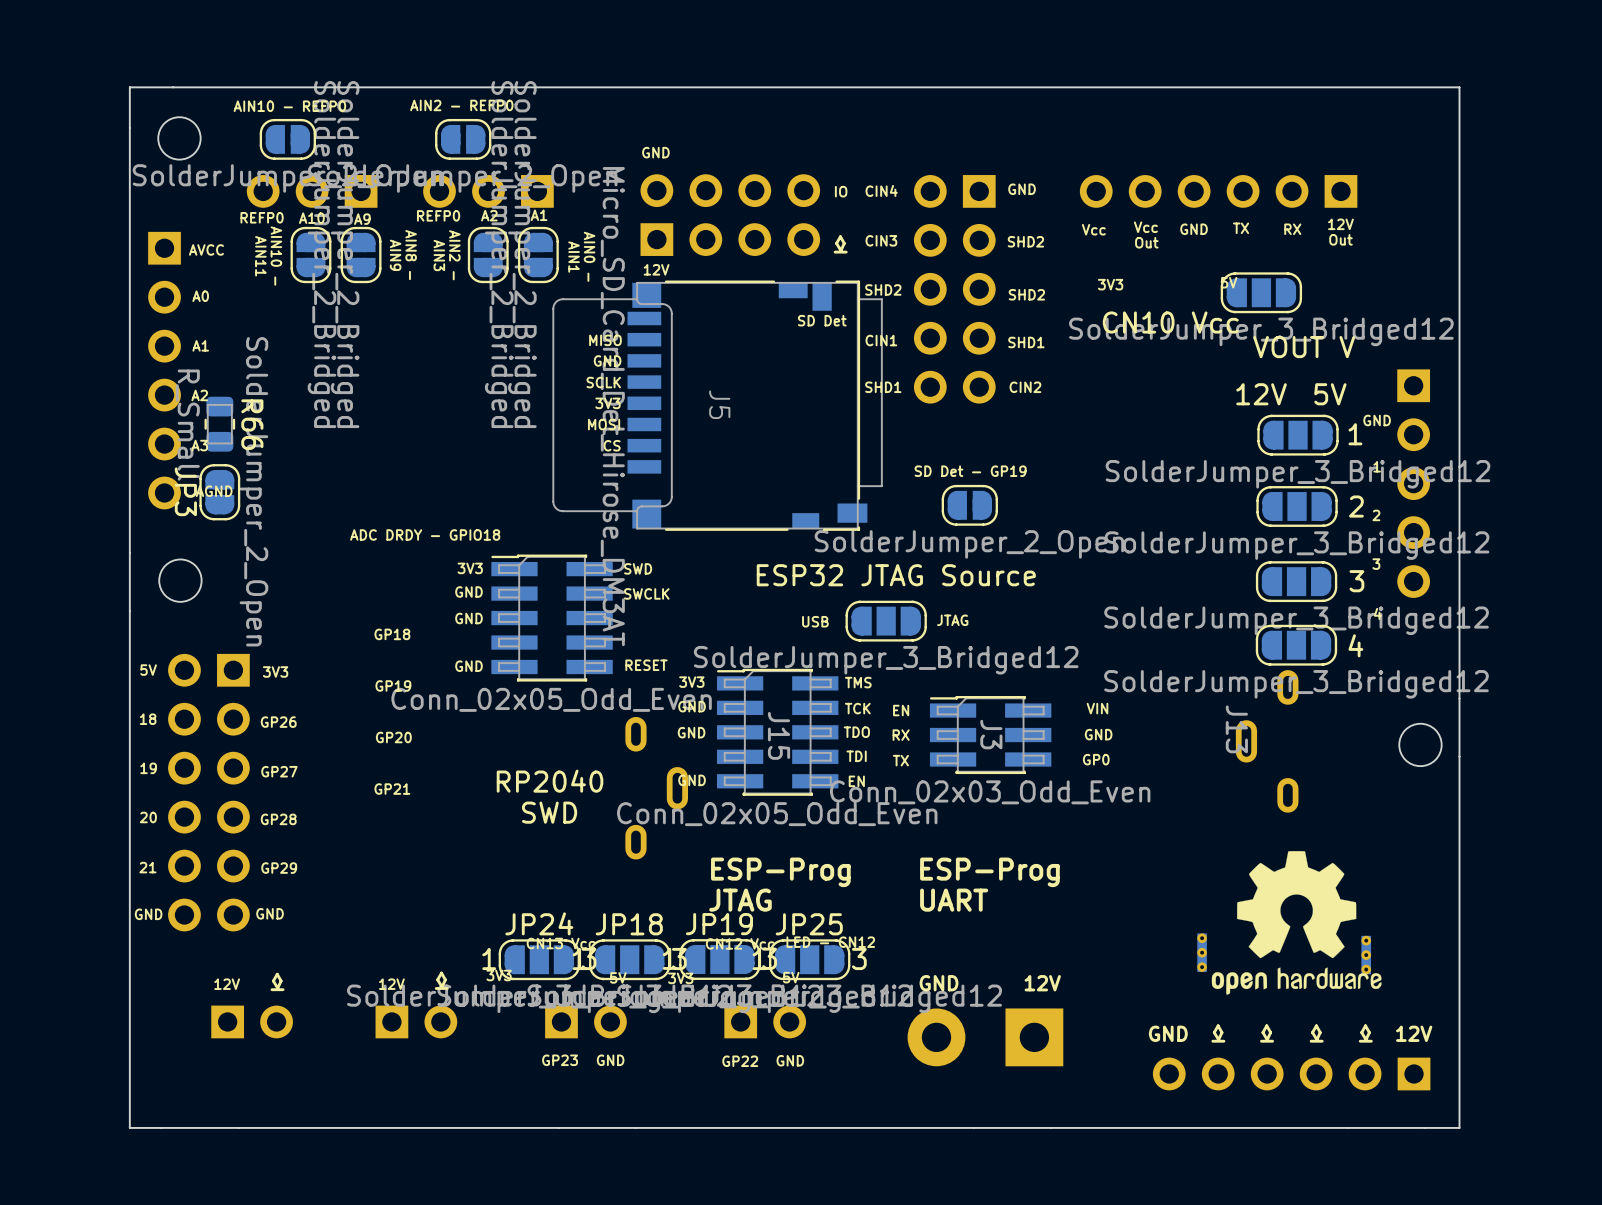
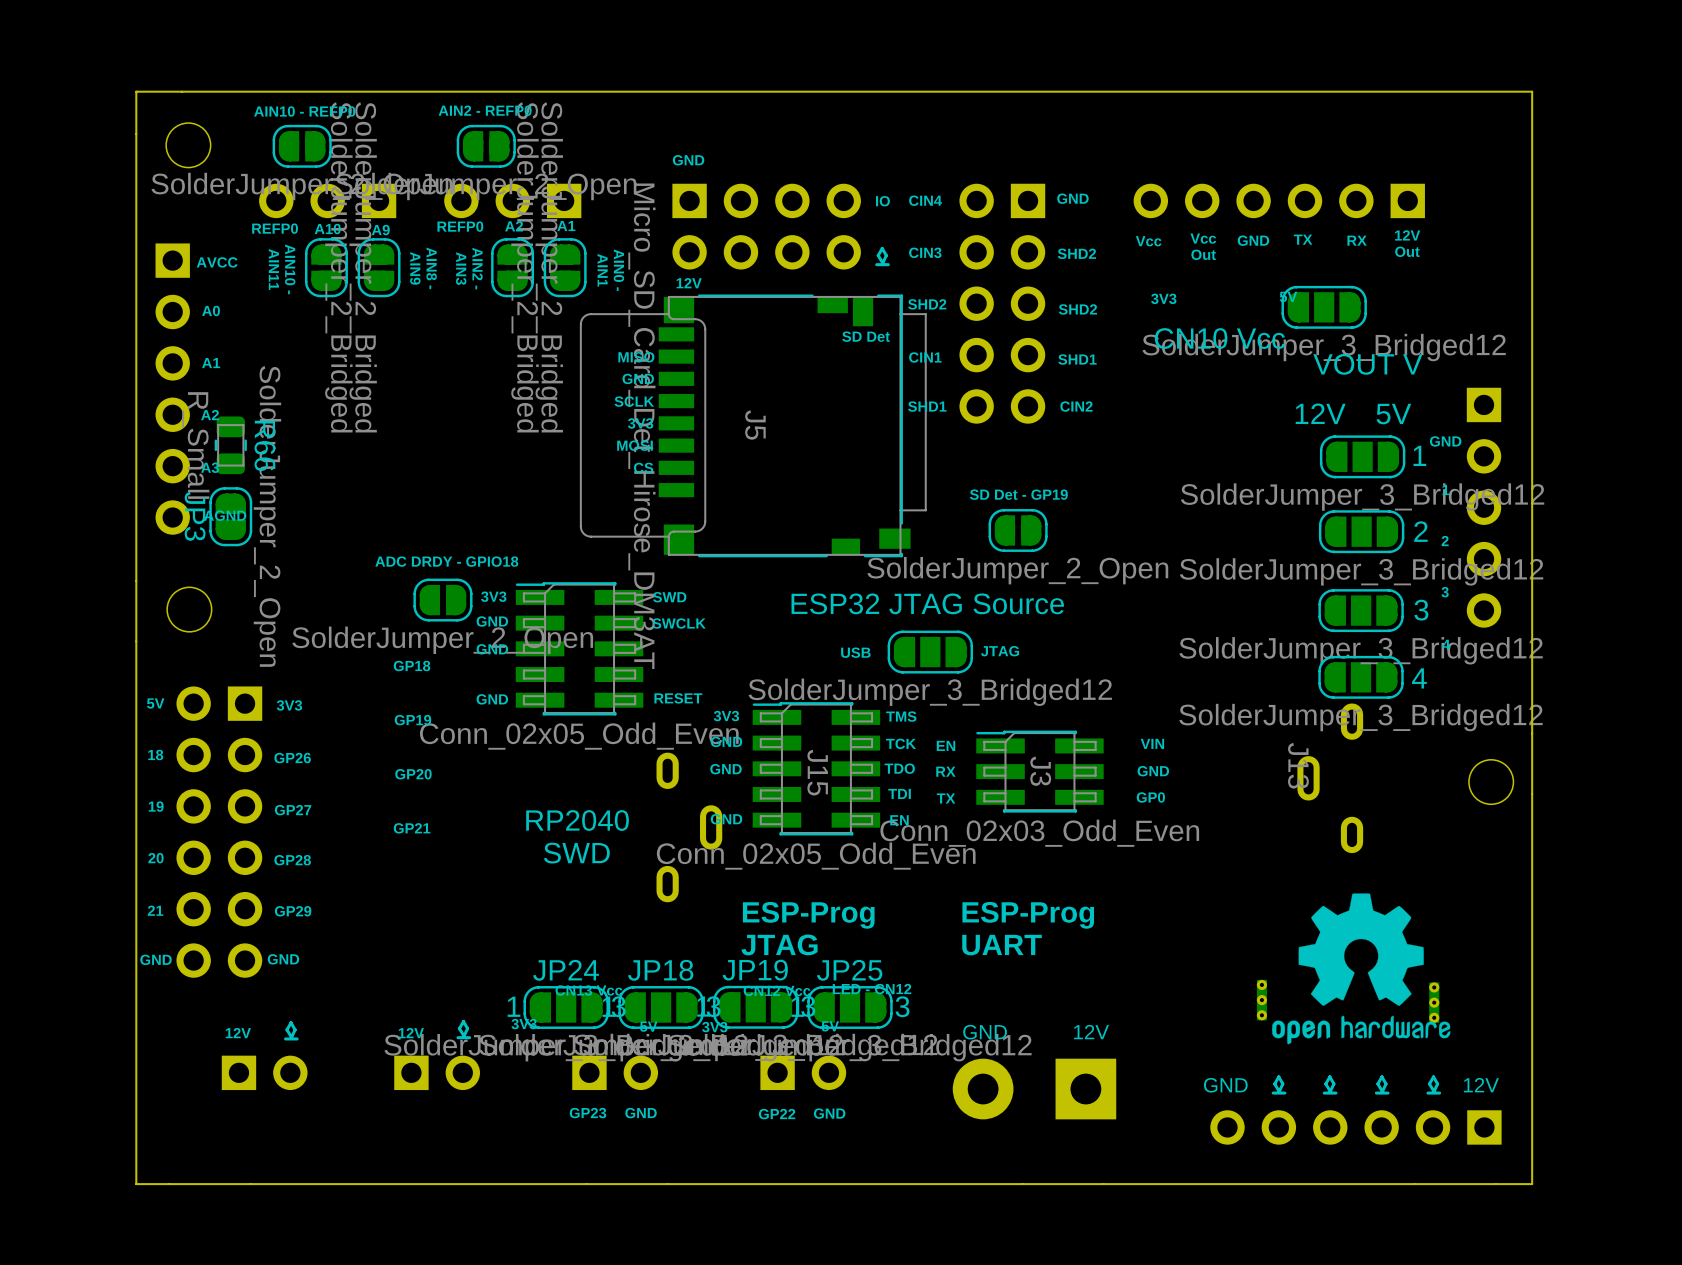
part footprint: [640, 174, 821, 256] -> [672, 183, 861, 270]
part: none -> SolderJumper_2_Open (442, 600)

